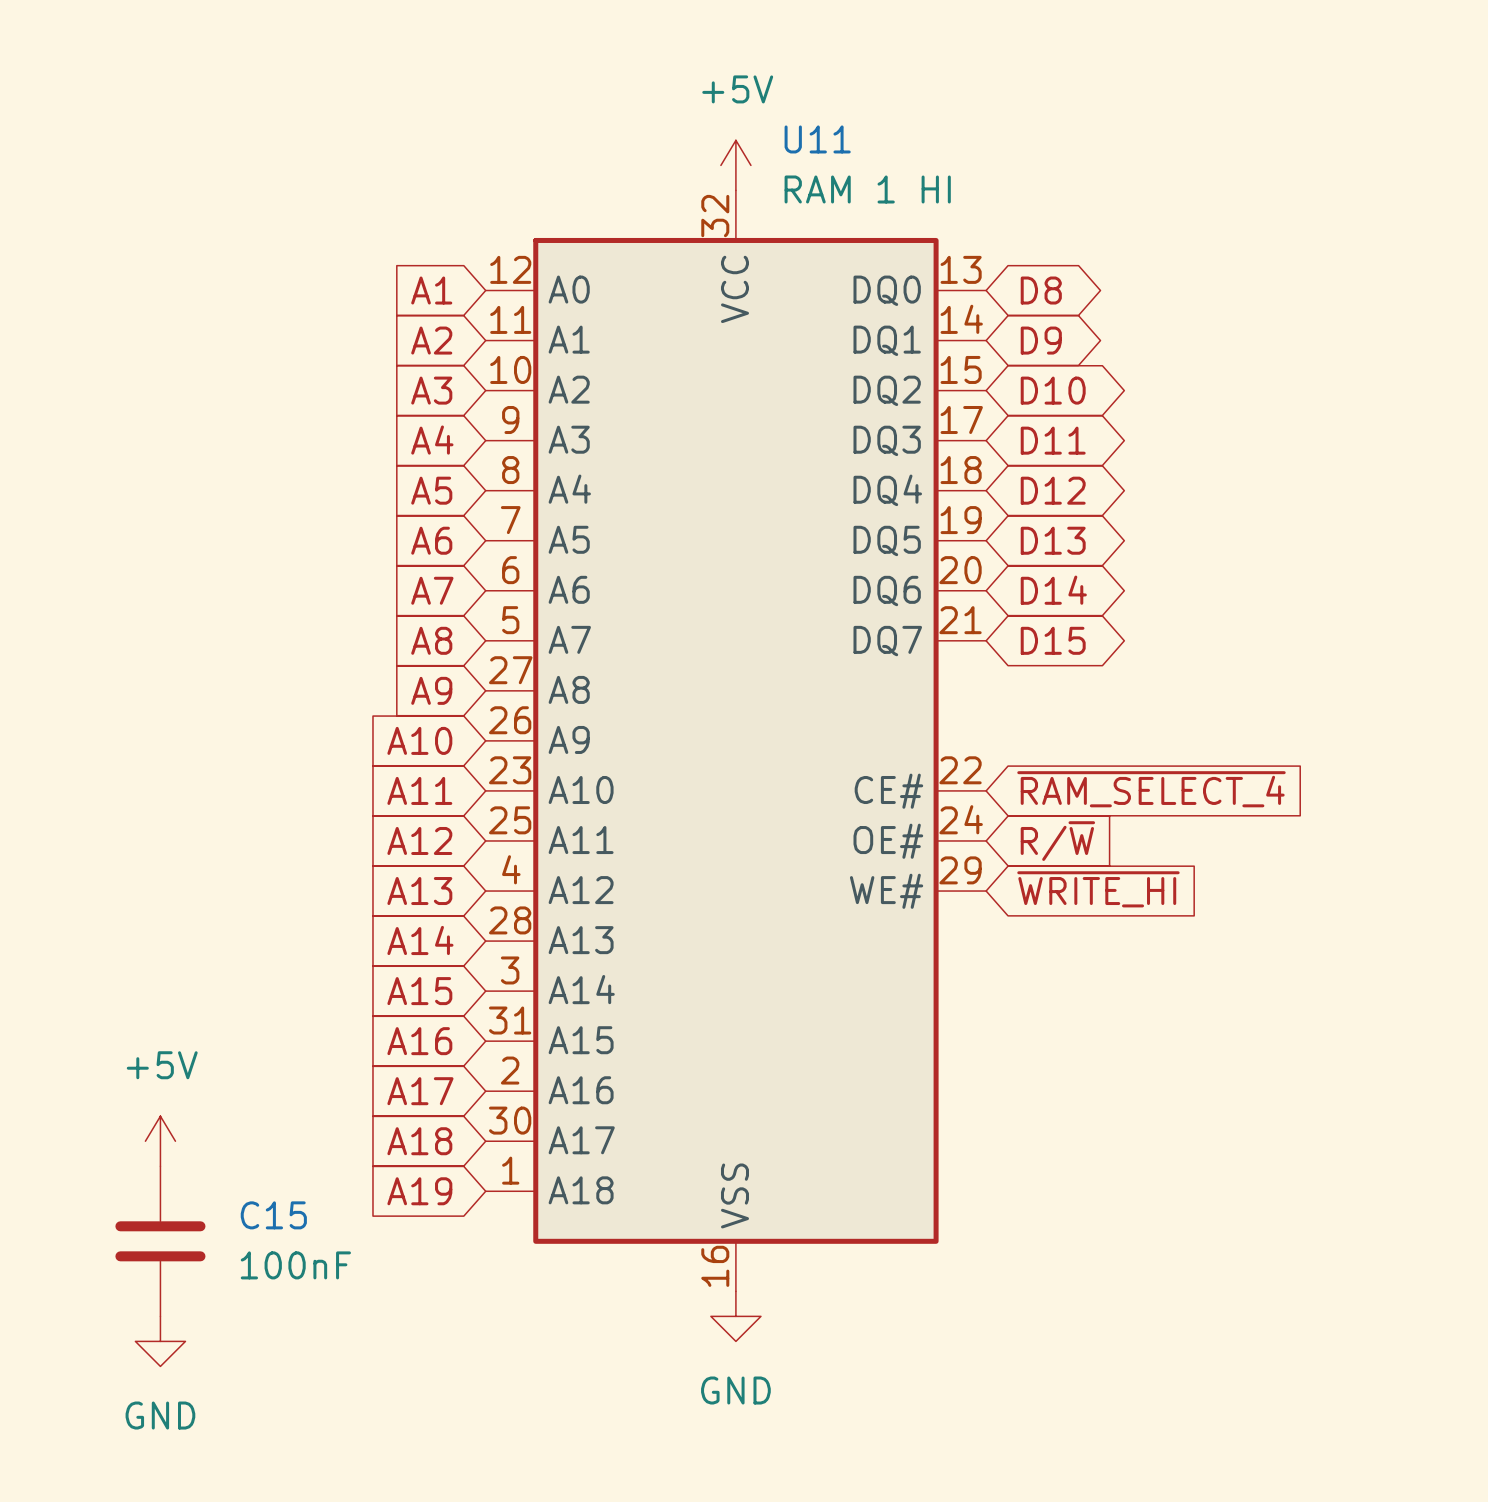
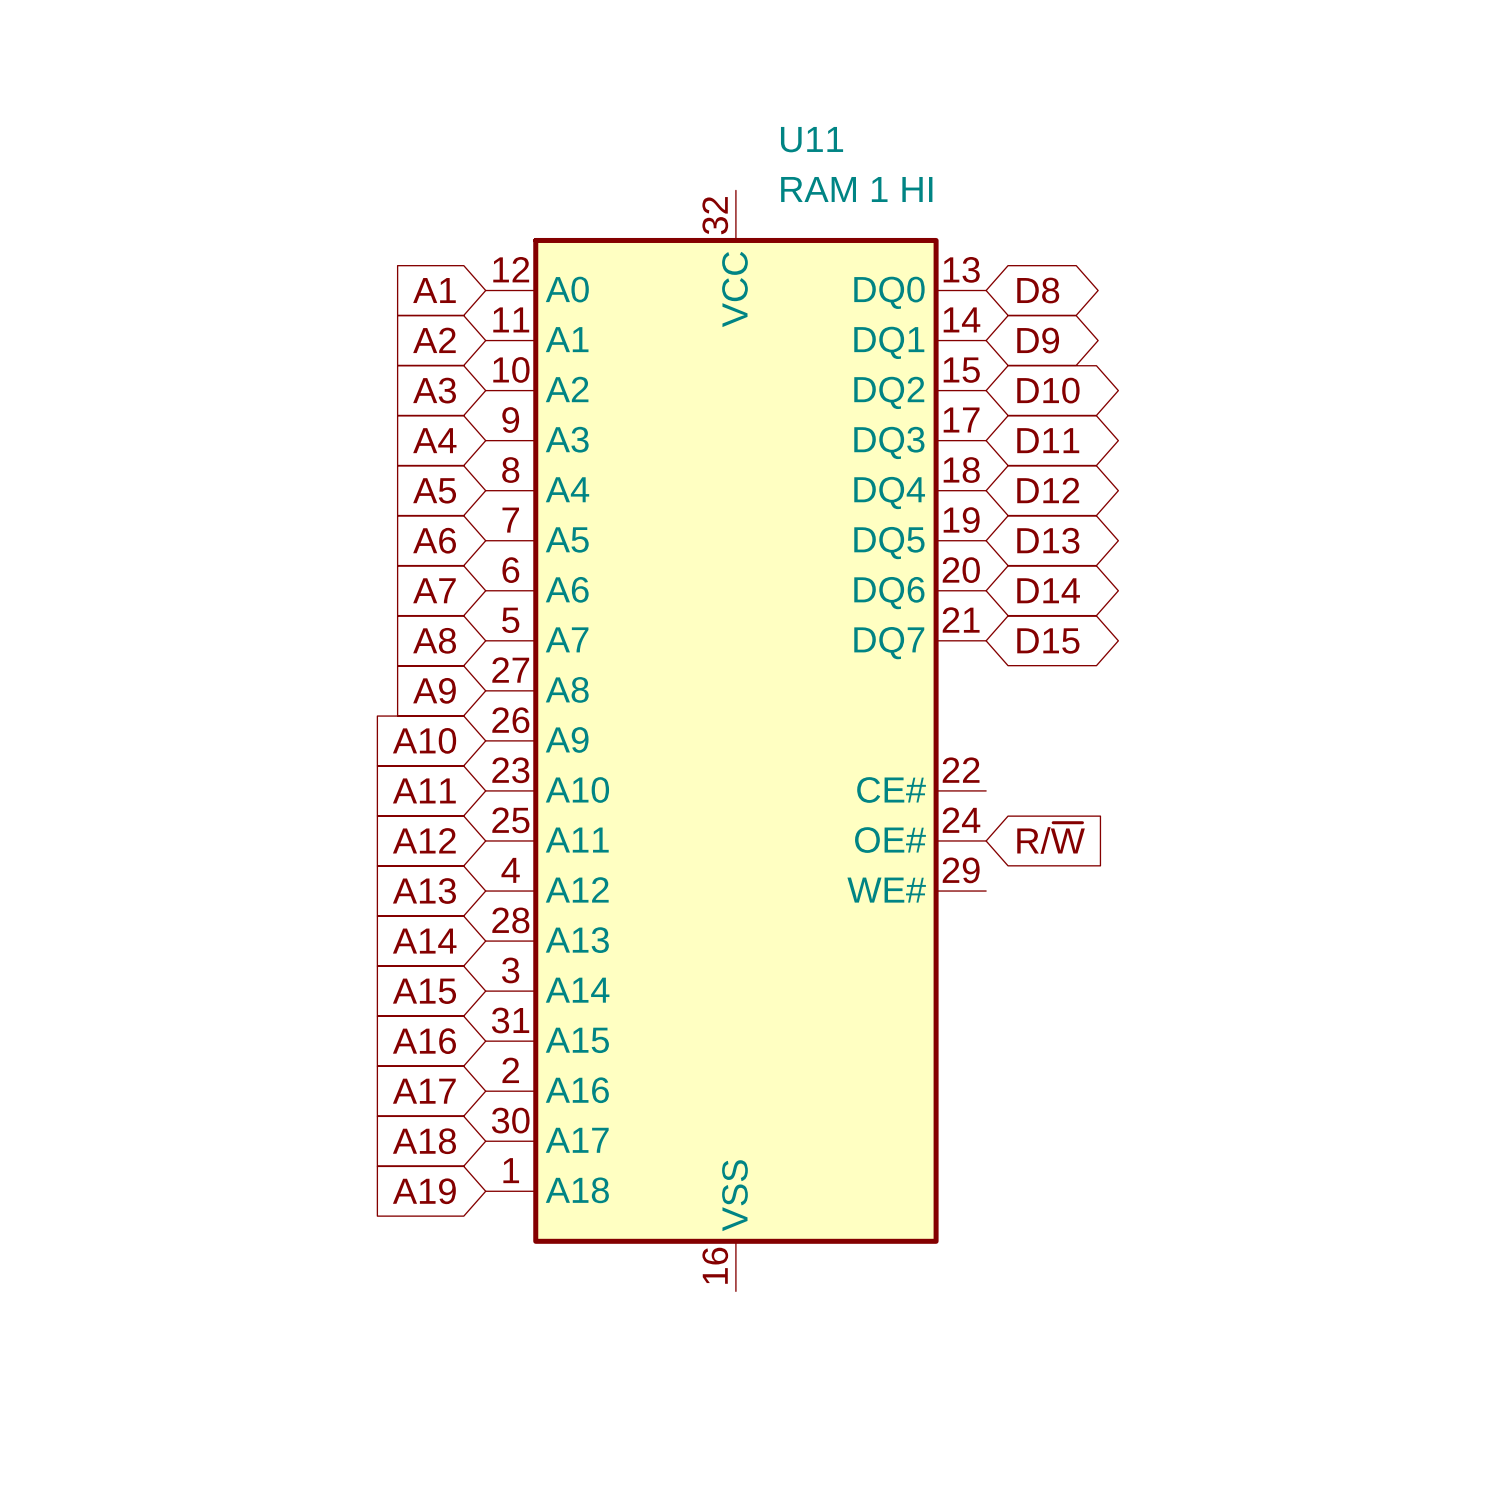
power symbol: +5V (735, 165) -> none
global label: ~{RAM_SELECT_4} (1151, 789) -> none
global label: ~{WRITE_HI} (1098, 889) -> none
power symbol: +5V (160, 1141) -> none
C15: 100nF (160, 1241) -> none
power symbol: GND (735, 1316) -> none
power symbol: GND (160, 1341) -> none

